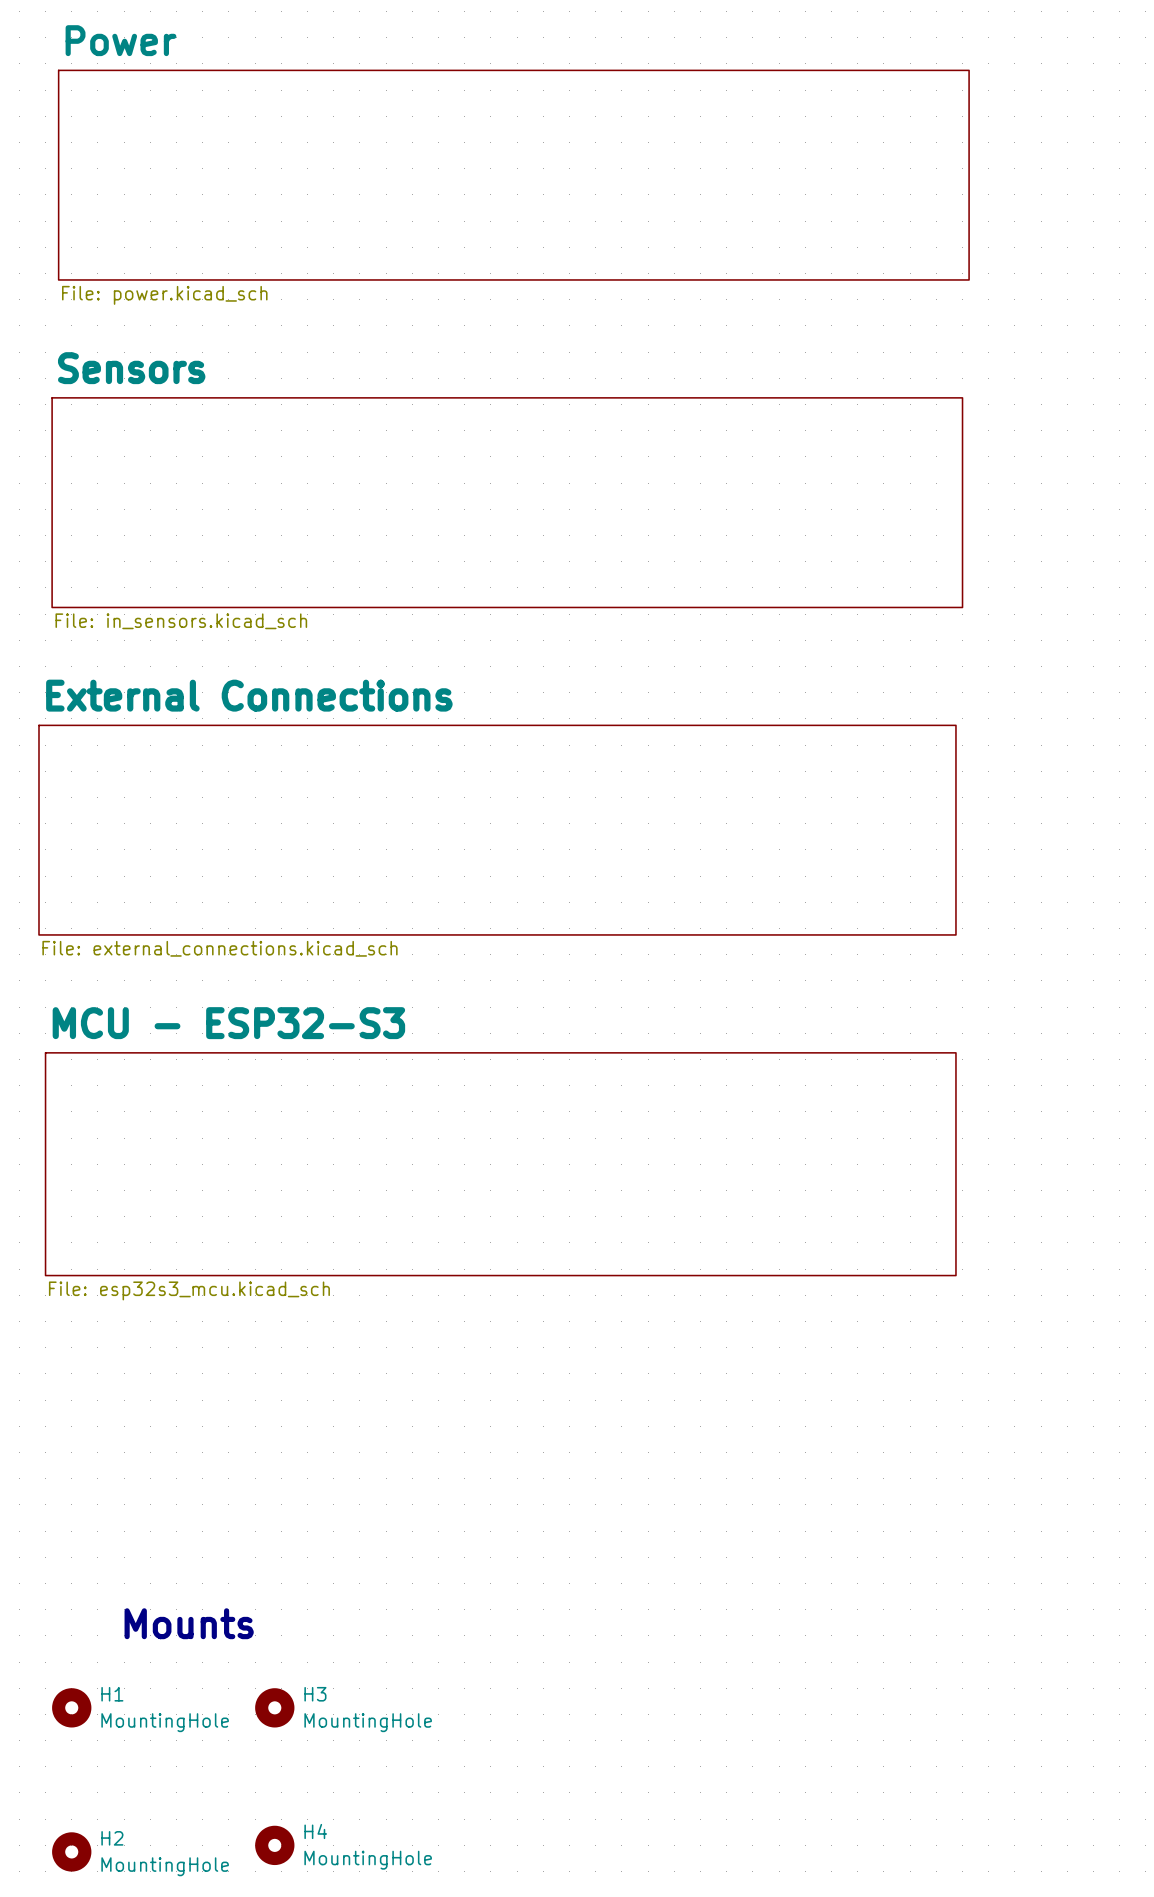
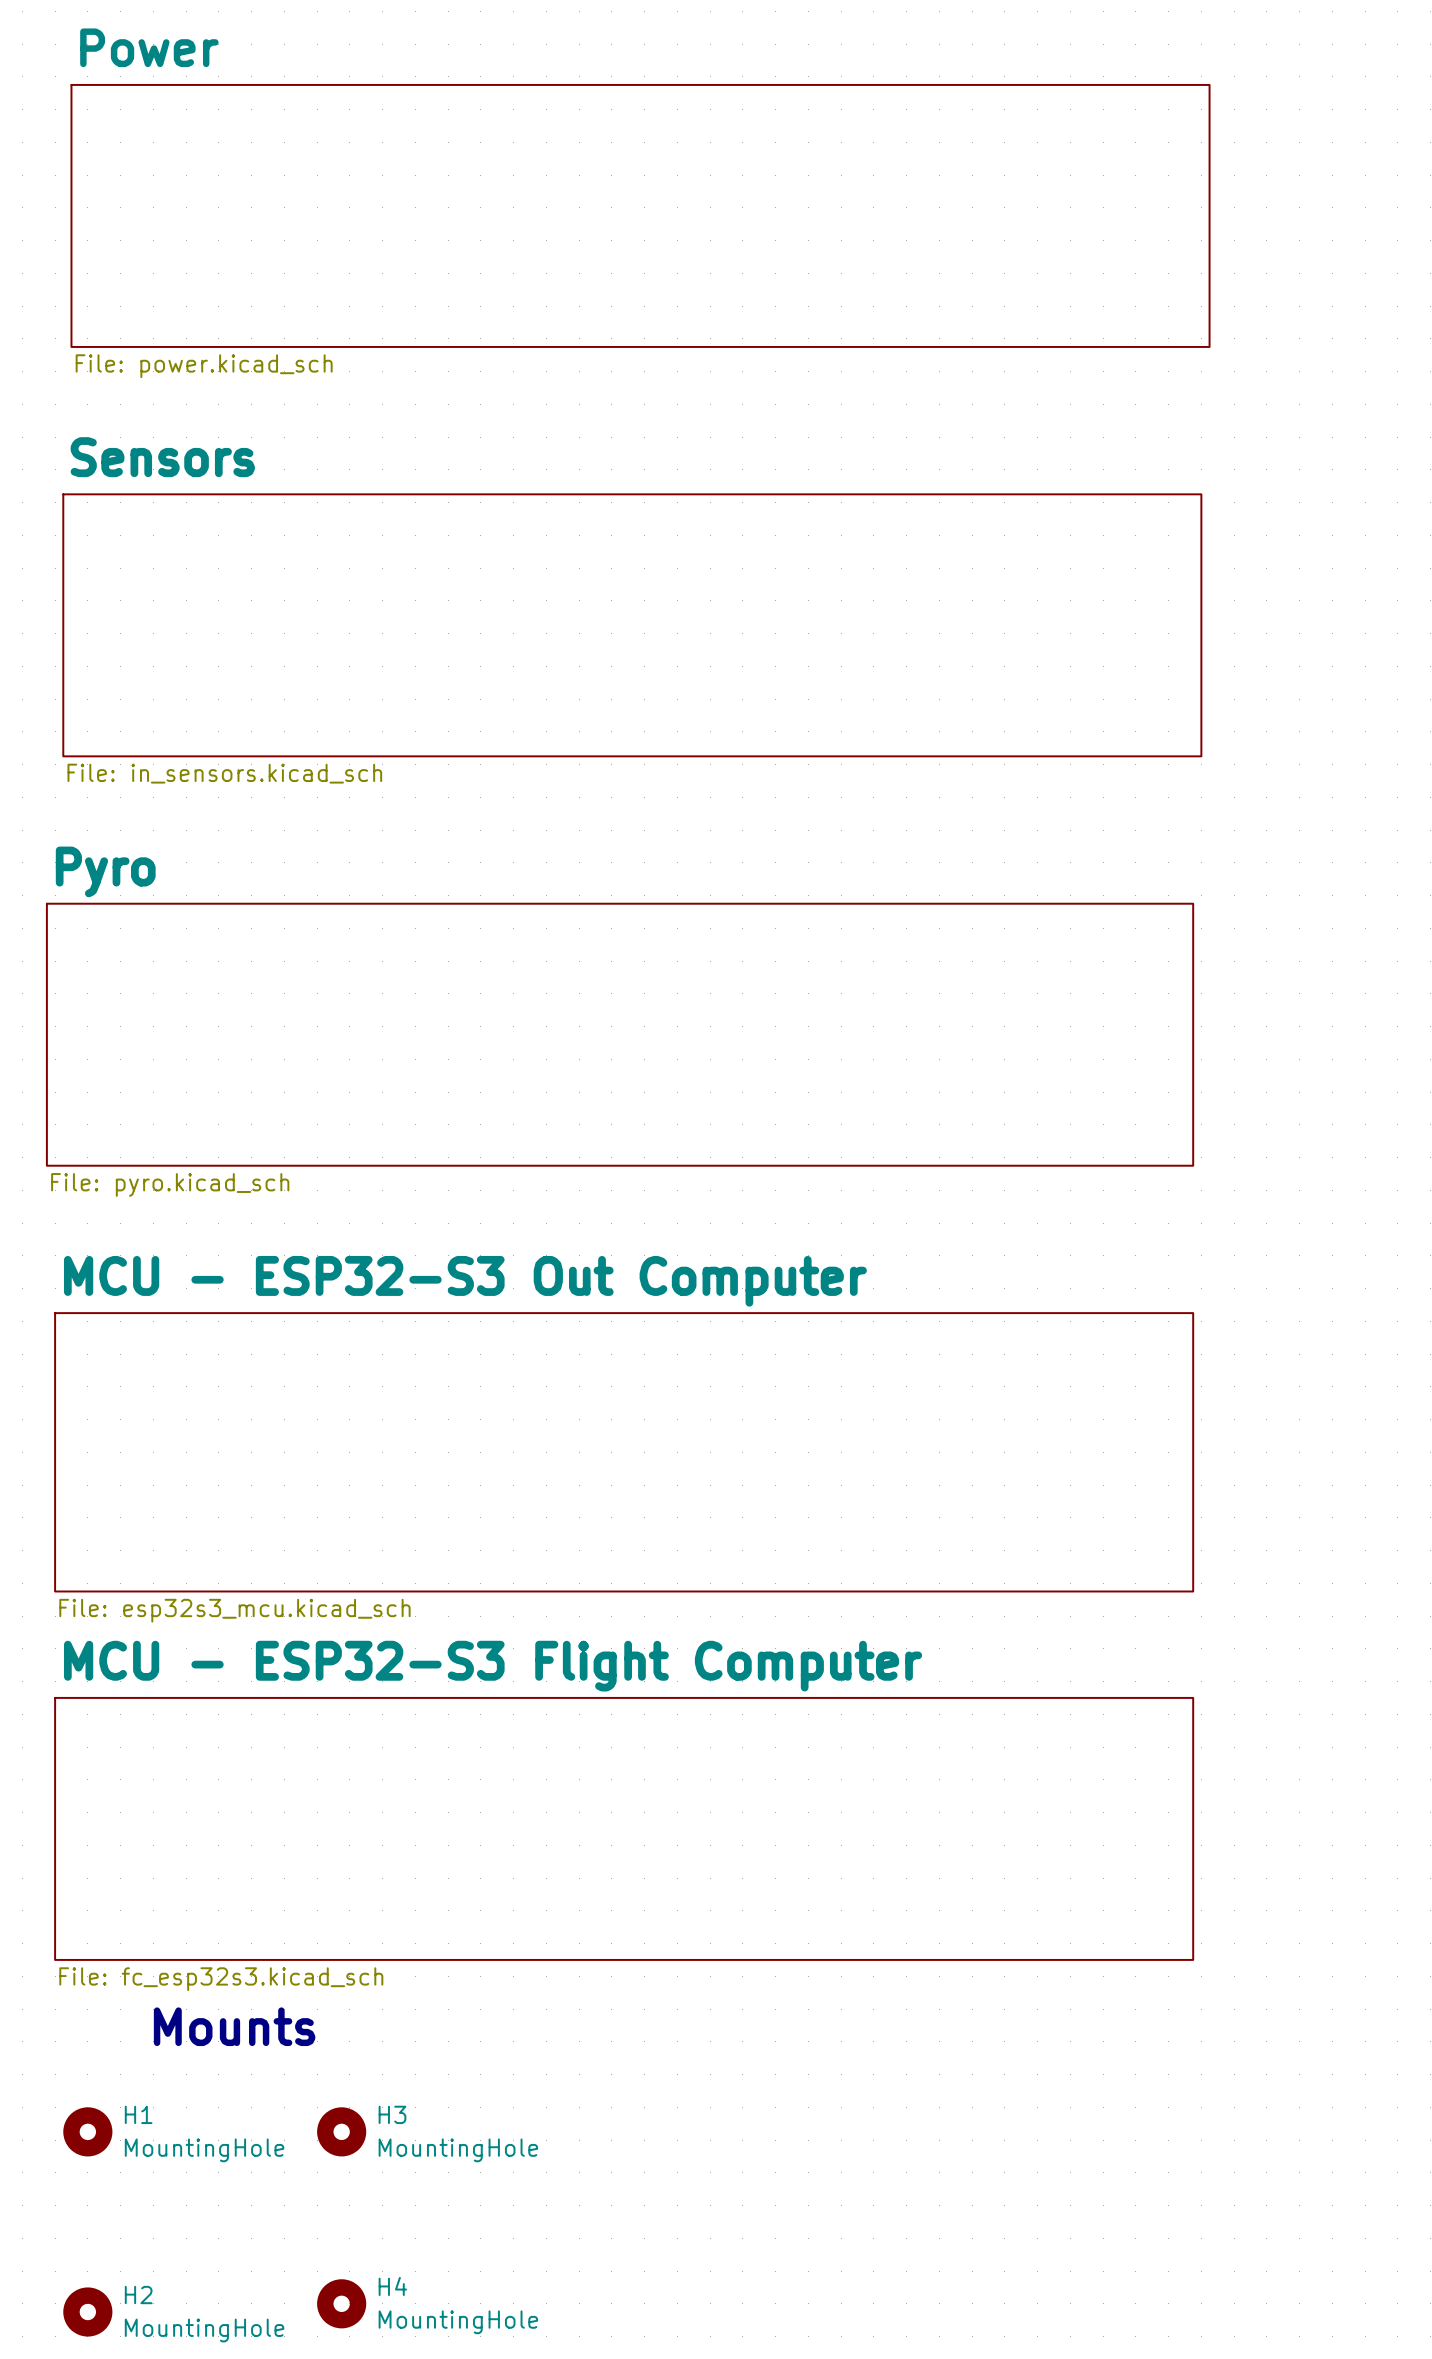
sheet External Connections name: External Connections (249, 695) -> Pyro (105, 871)
sheet External Connections value: File: external_connections.kicad_sch (219, 948) -> File: pyro.kicad_sch (170, 1184)
sheet MCU - ESP32-S3 name: MCU - ESP32-S3 (228, 1023) -> MCU - ESP32-S3 Out Computer (465, 1281)
sheet MCU - ESP32-S3 Flight Computer: none -> File: fc_esp32s3.kicad_sch (624, 1828)

